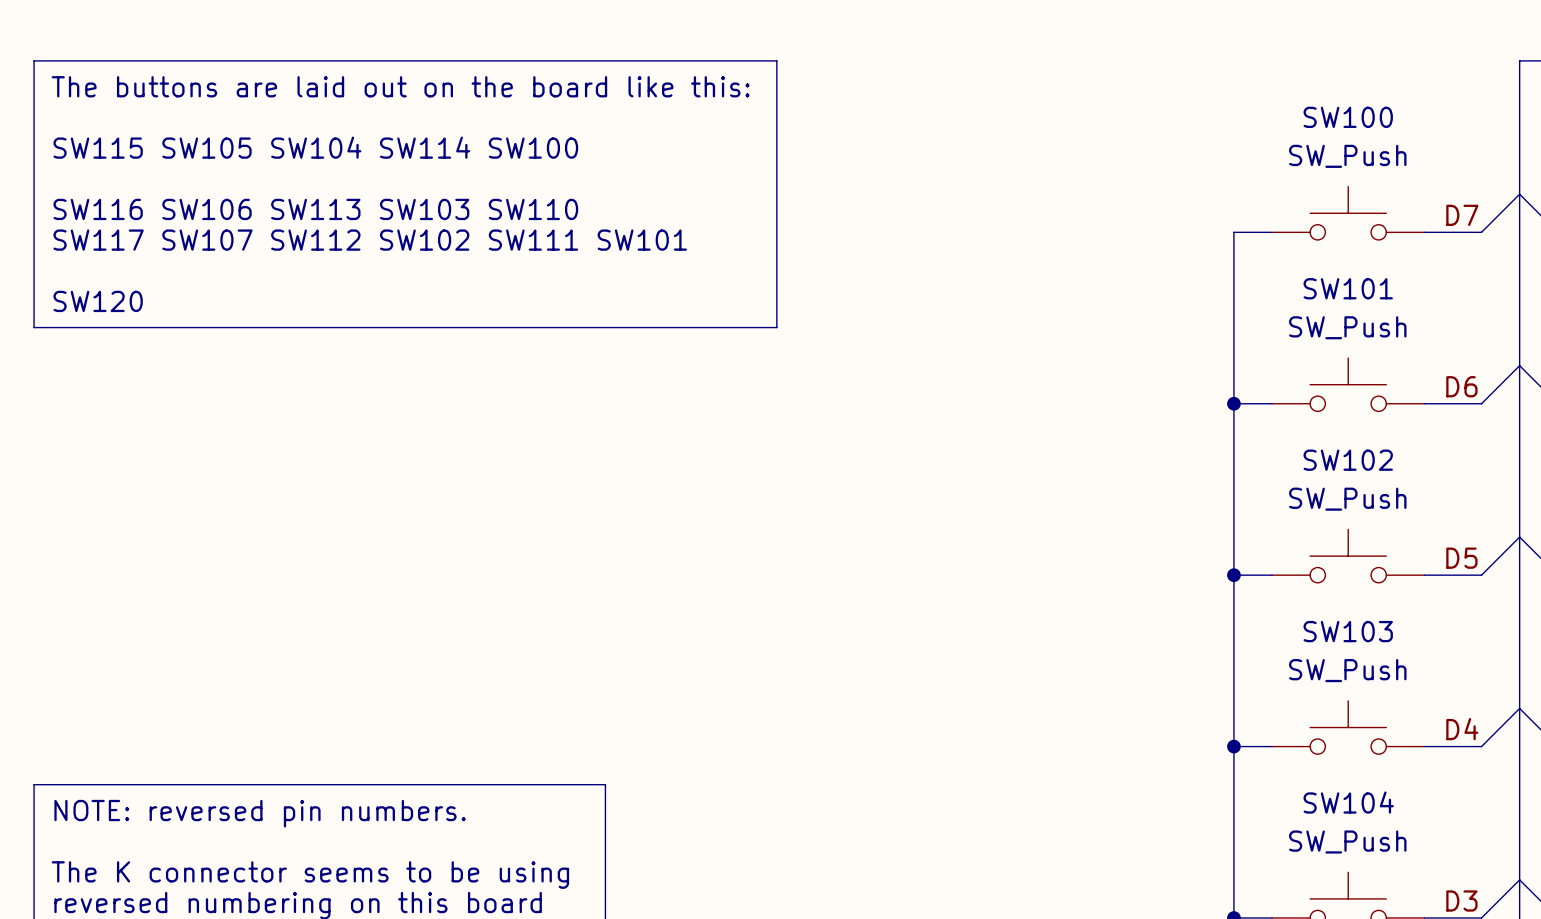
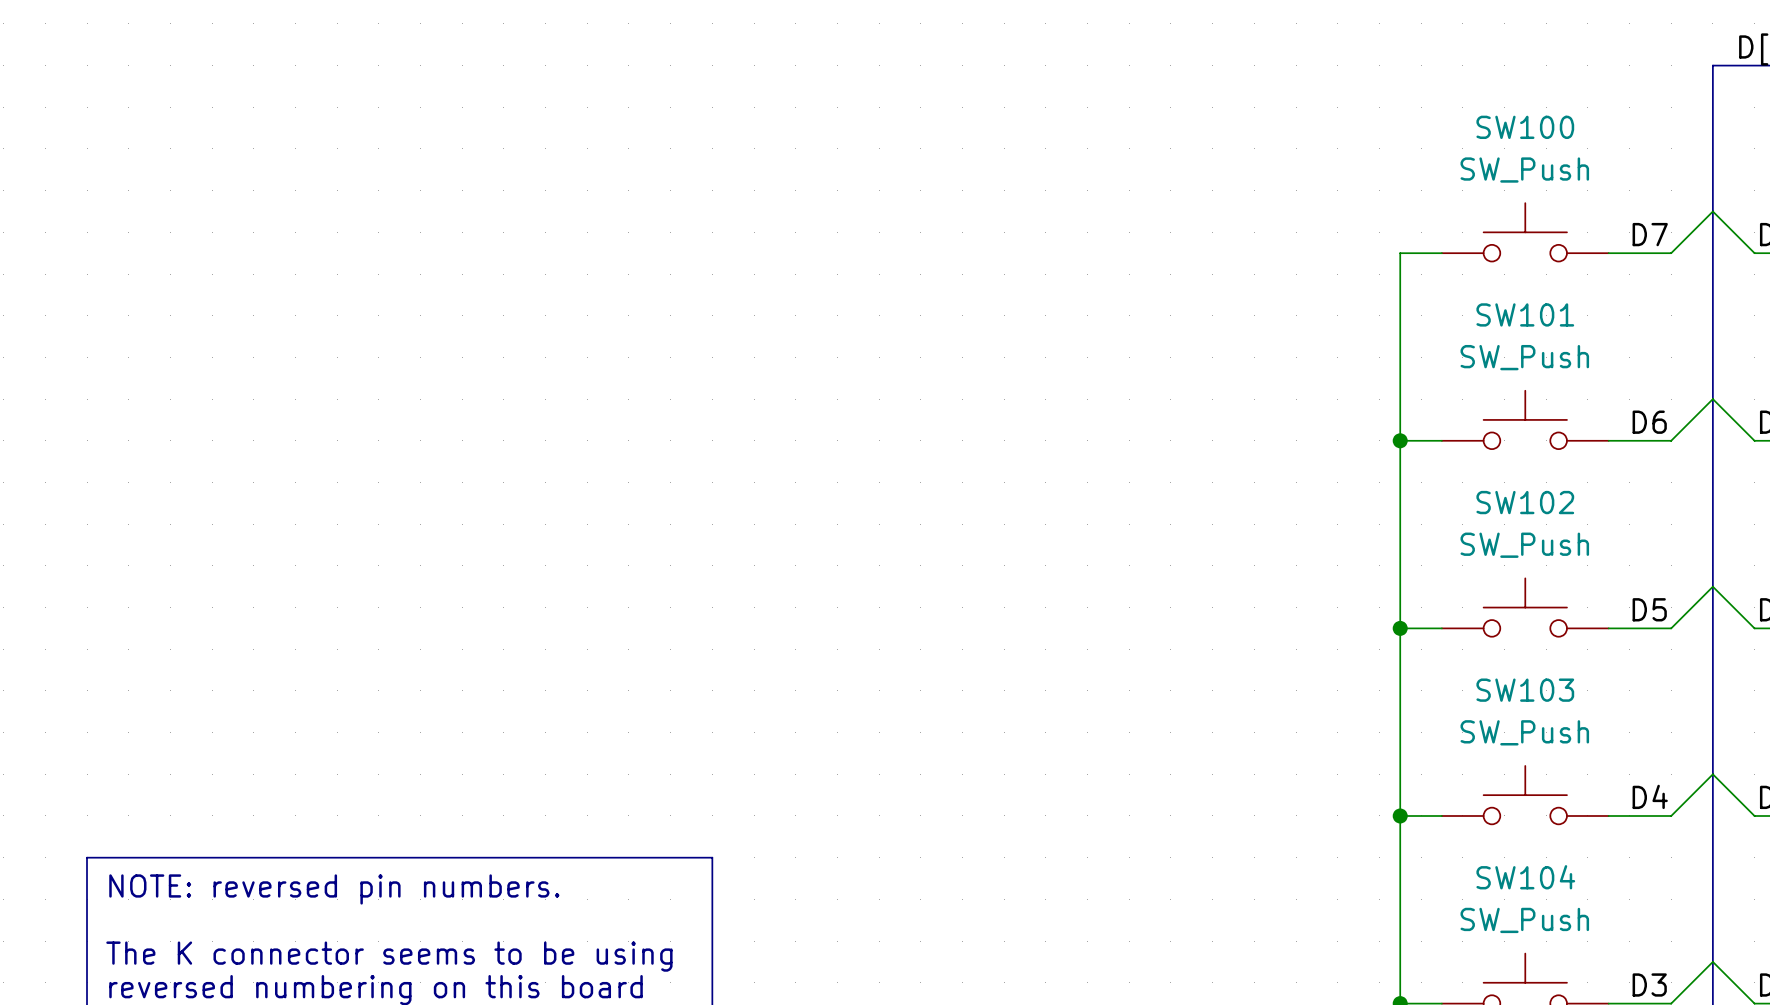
line: (34, 60) (776, 60) (776, 327) (34, 327) (34, 60) -> none
text: The buttons are laid out on the board like this: (400, 86) -> none
text: SW115 SW105 SW104 SW114 SW100 (315, 147) -> none
text: SW116 SW106 SW113 SW103 SW110 (315, 209) -> none
text: SW117 SW107 SW112 SW102 SW111 SW101 (370, 240) -> none
text: SW120 (98, 301) -> none

